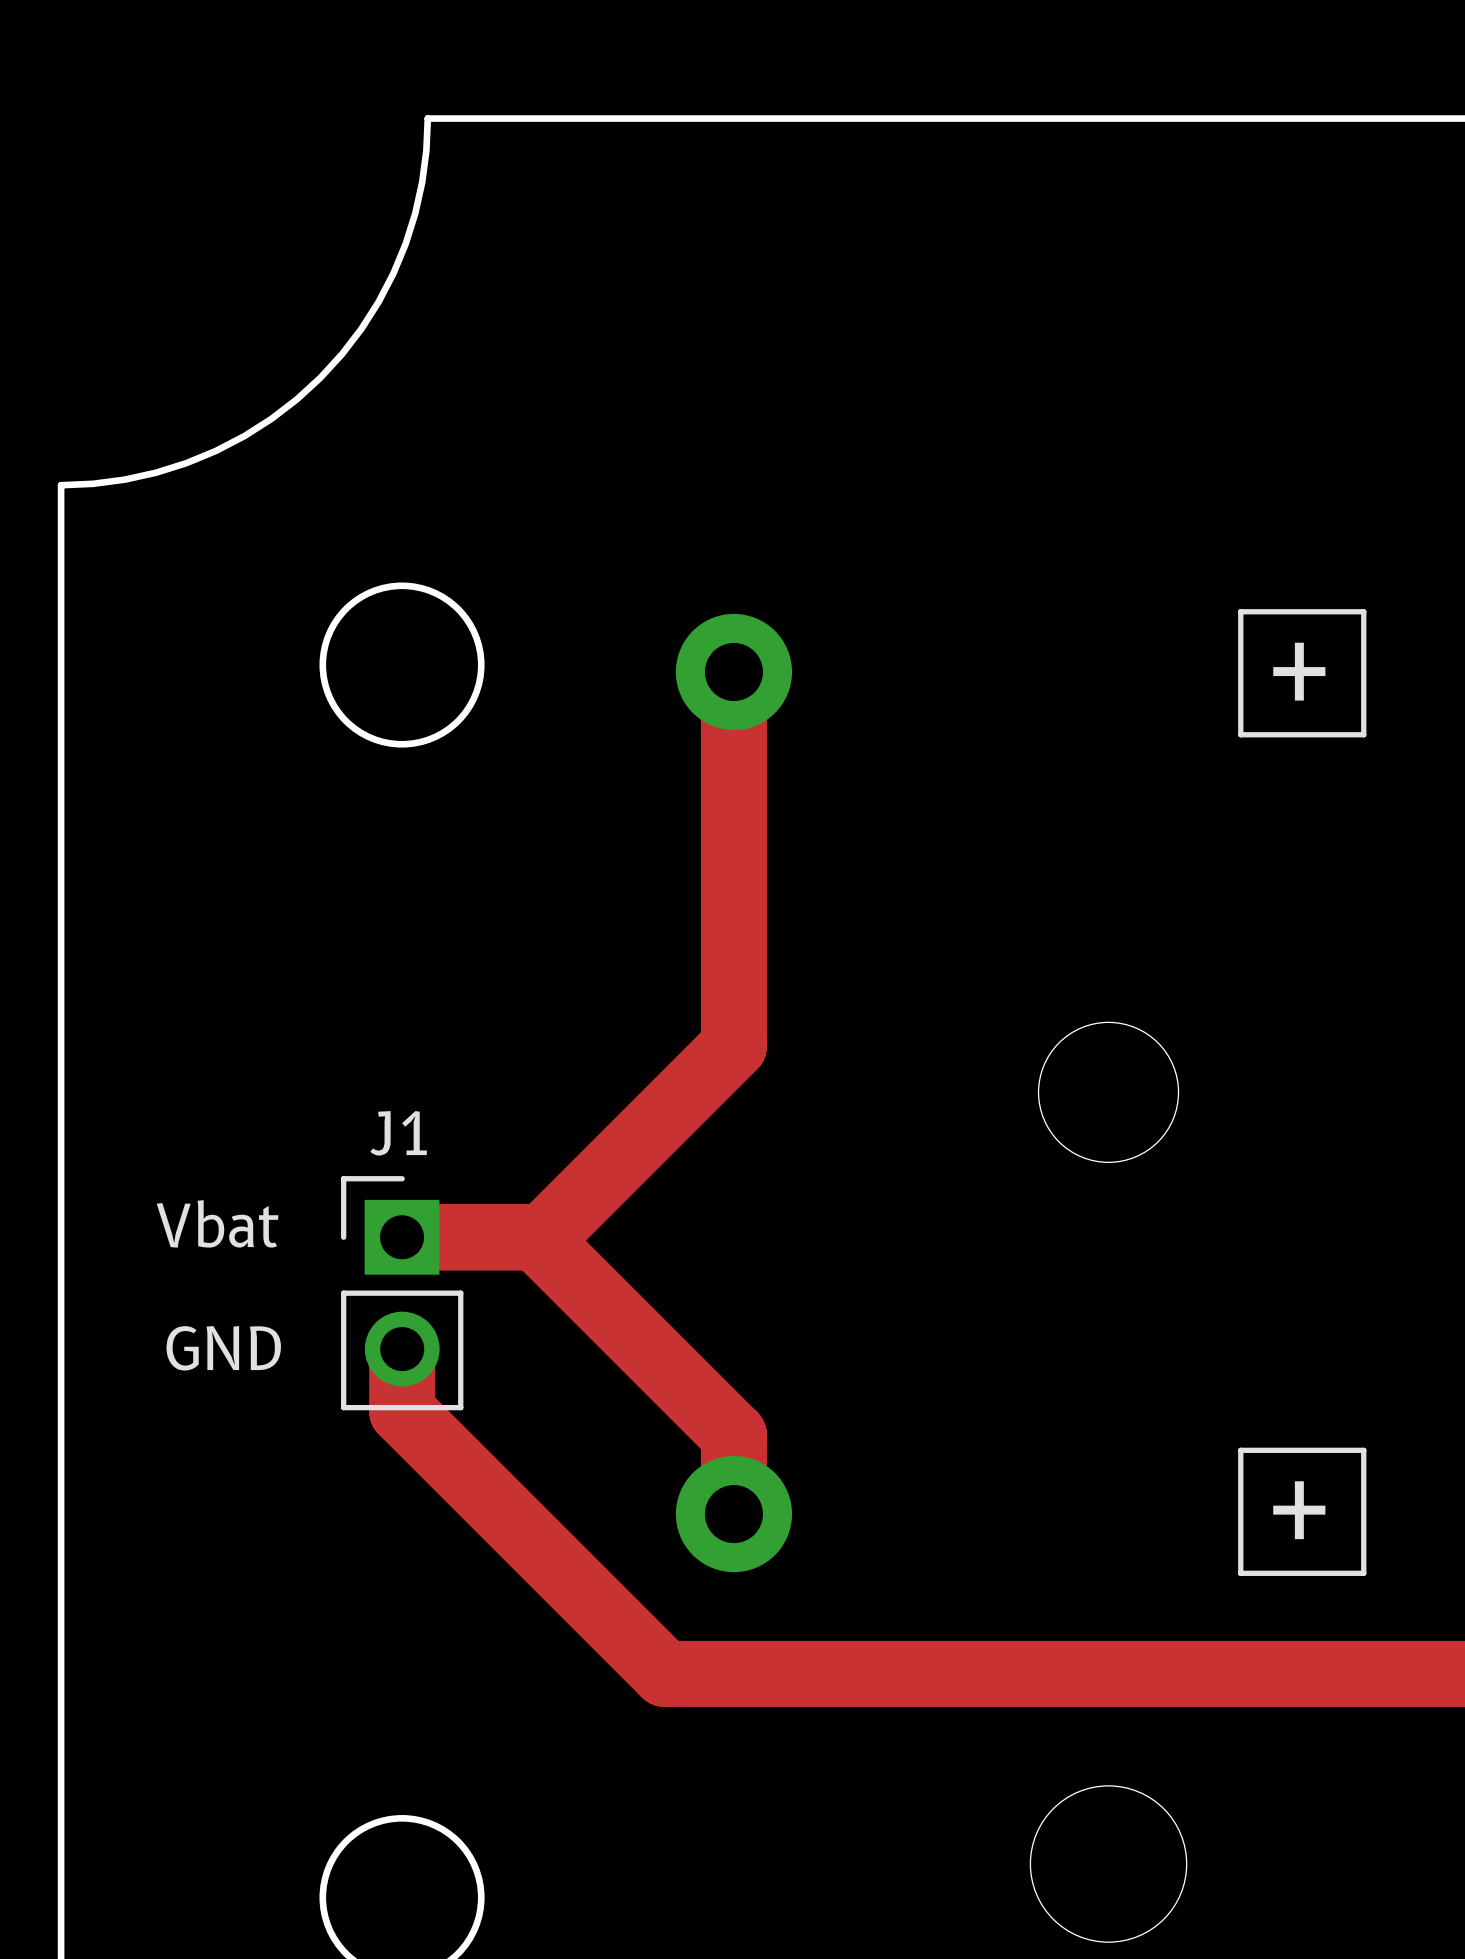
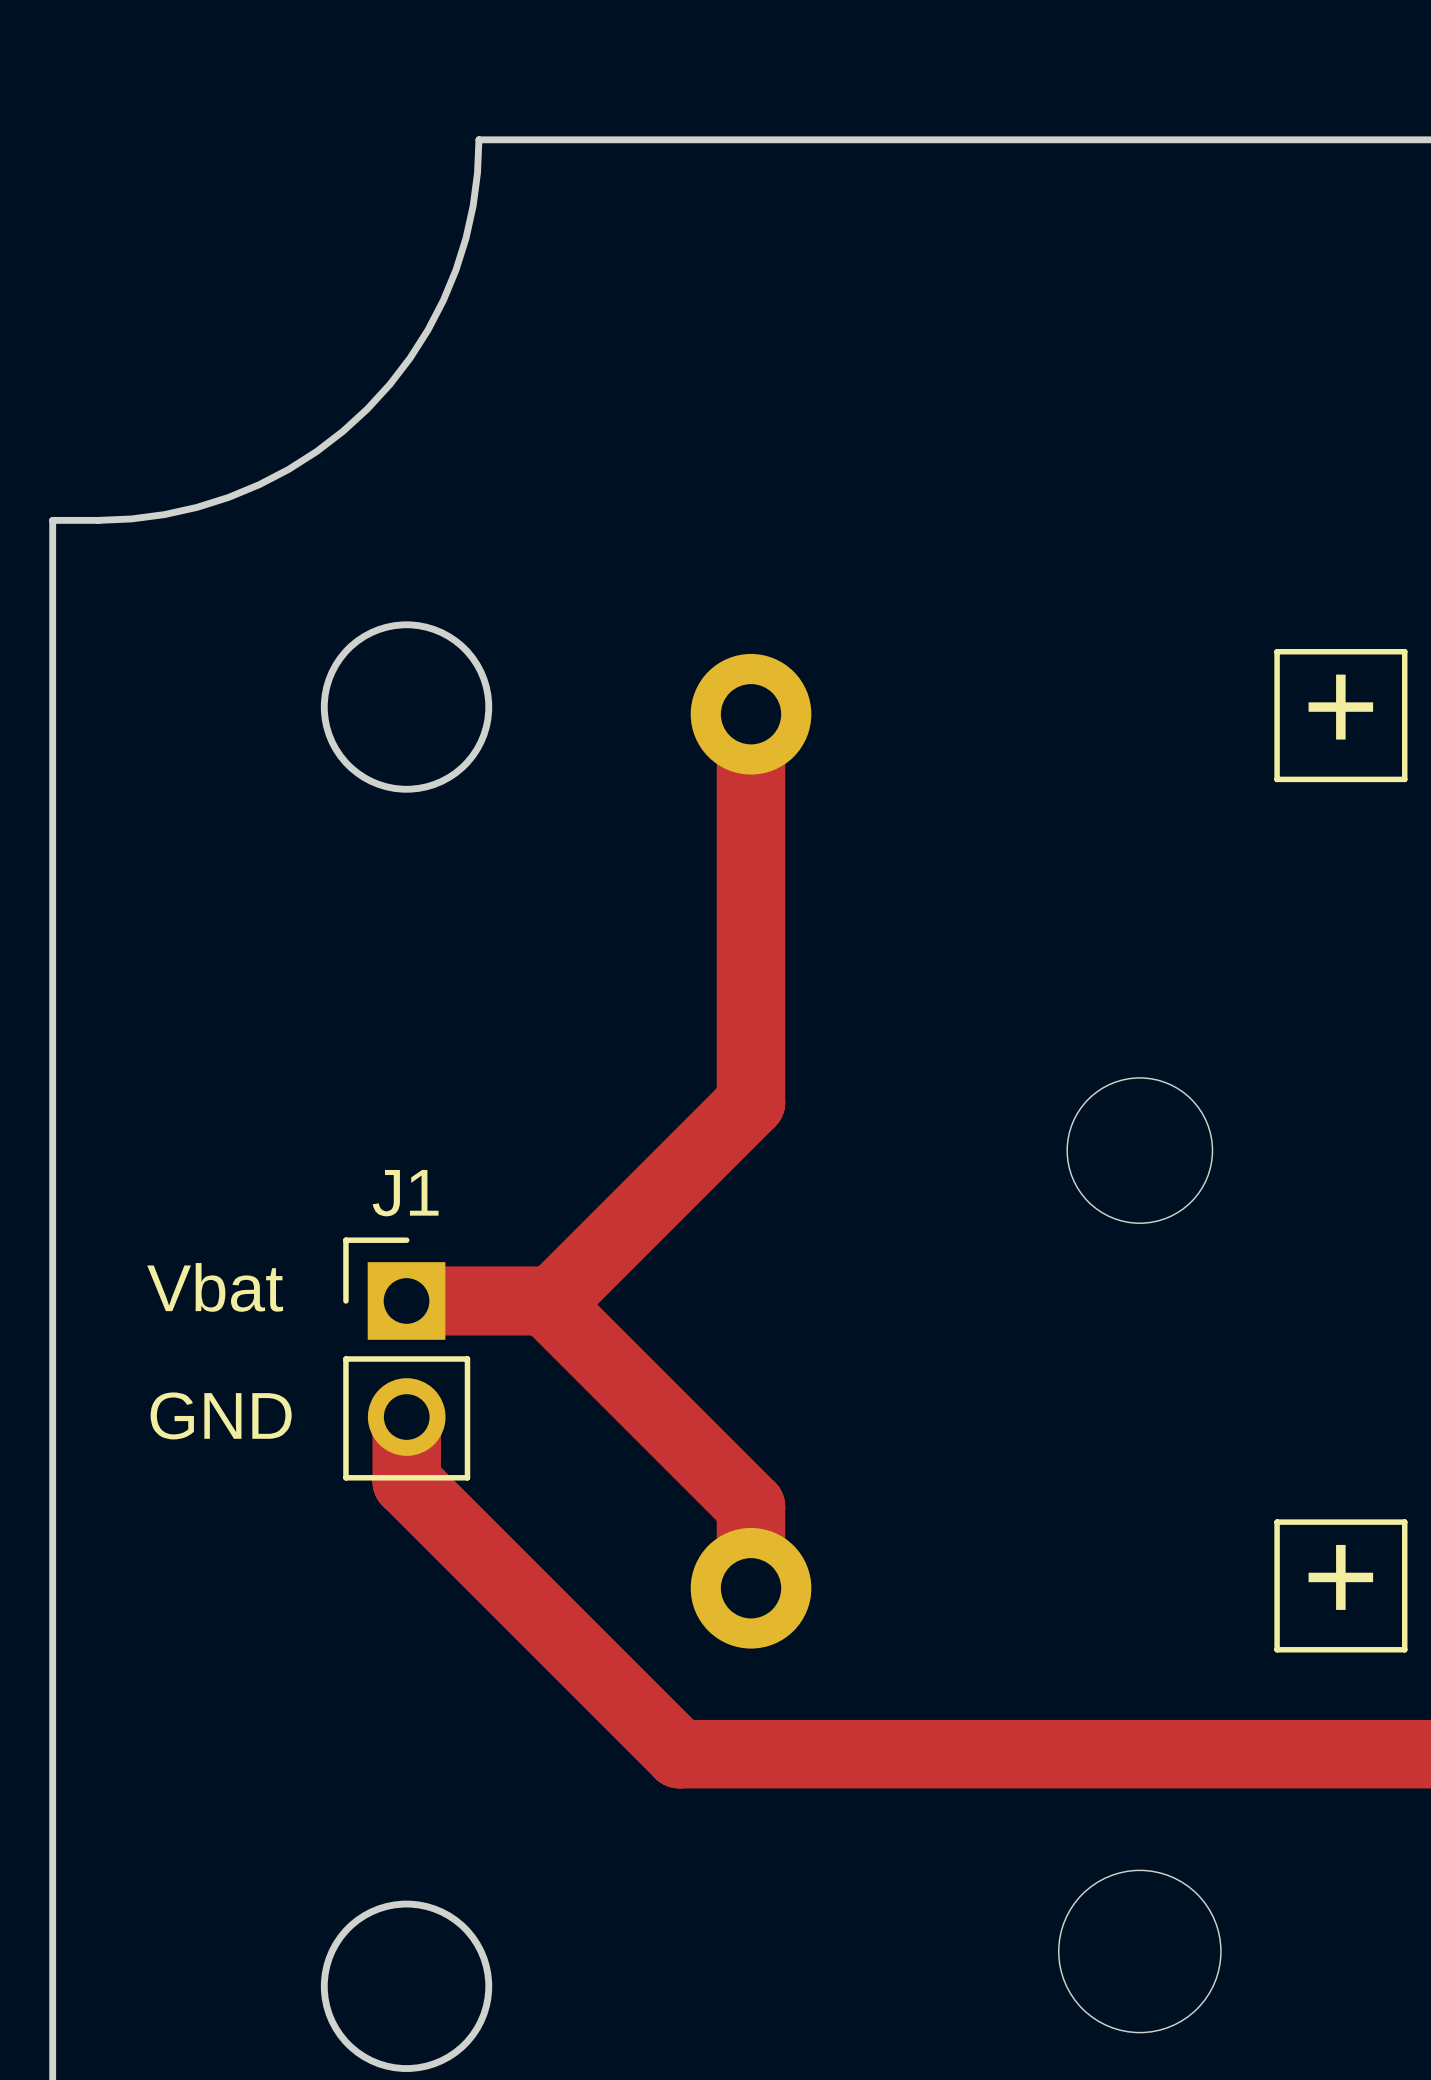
board edge: (471, 118) (427, 118) (422, 182) (405, 243) (393, 273) (361, 328) (342, 354) (296, 399) (244, 436) (186, 463) (124, 479) (61, 485) -> (478, 139) (473, 205) (456, 269) (443, 300) (410, 358) (389, 384) (343, 431) (316, 451) (259, 484) (196, 507) (131, 518) (52, 520)

